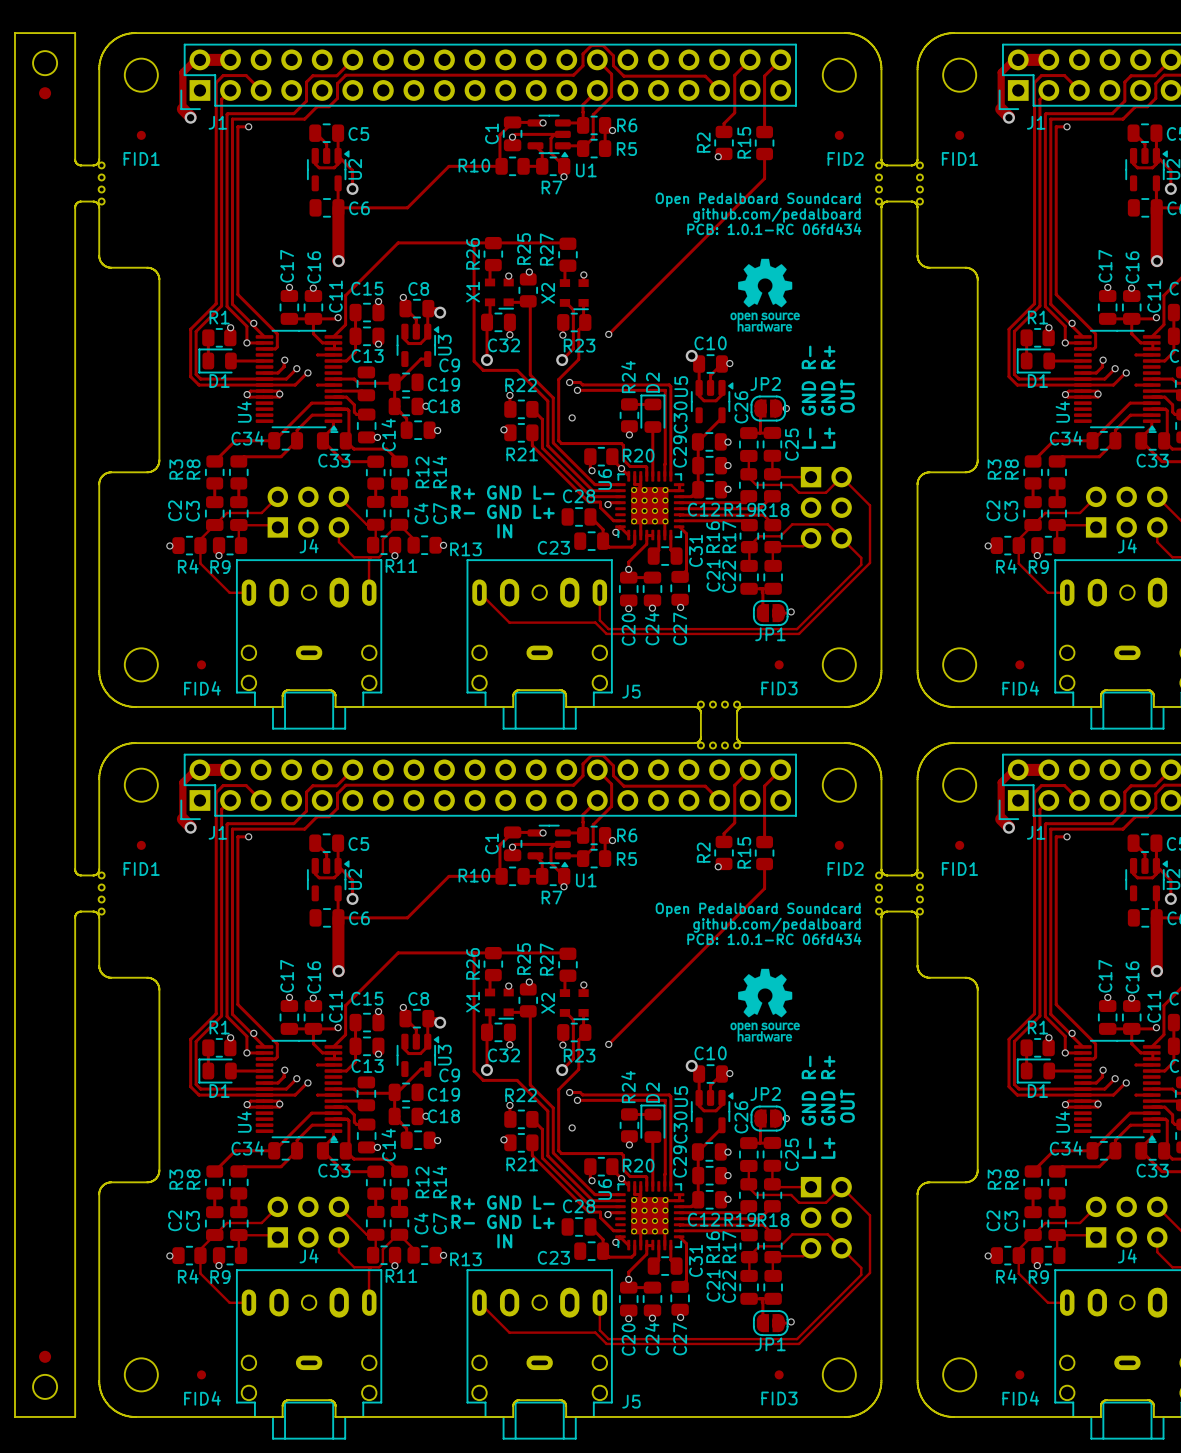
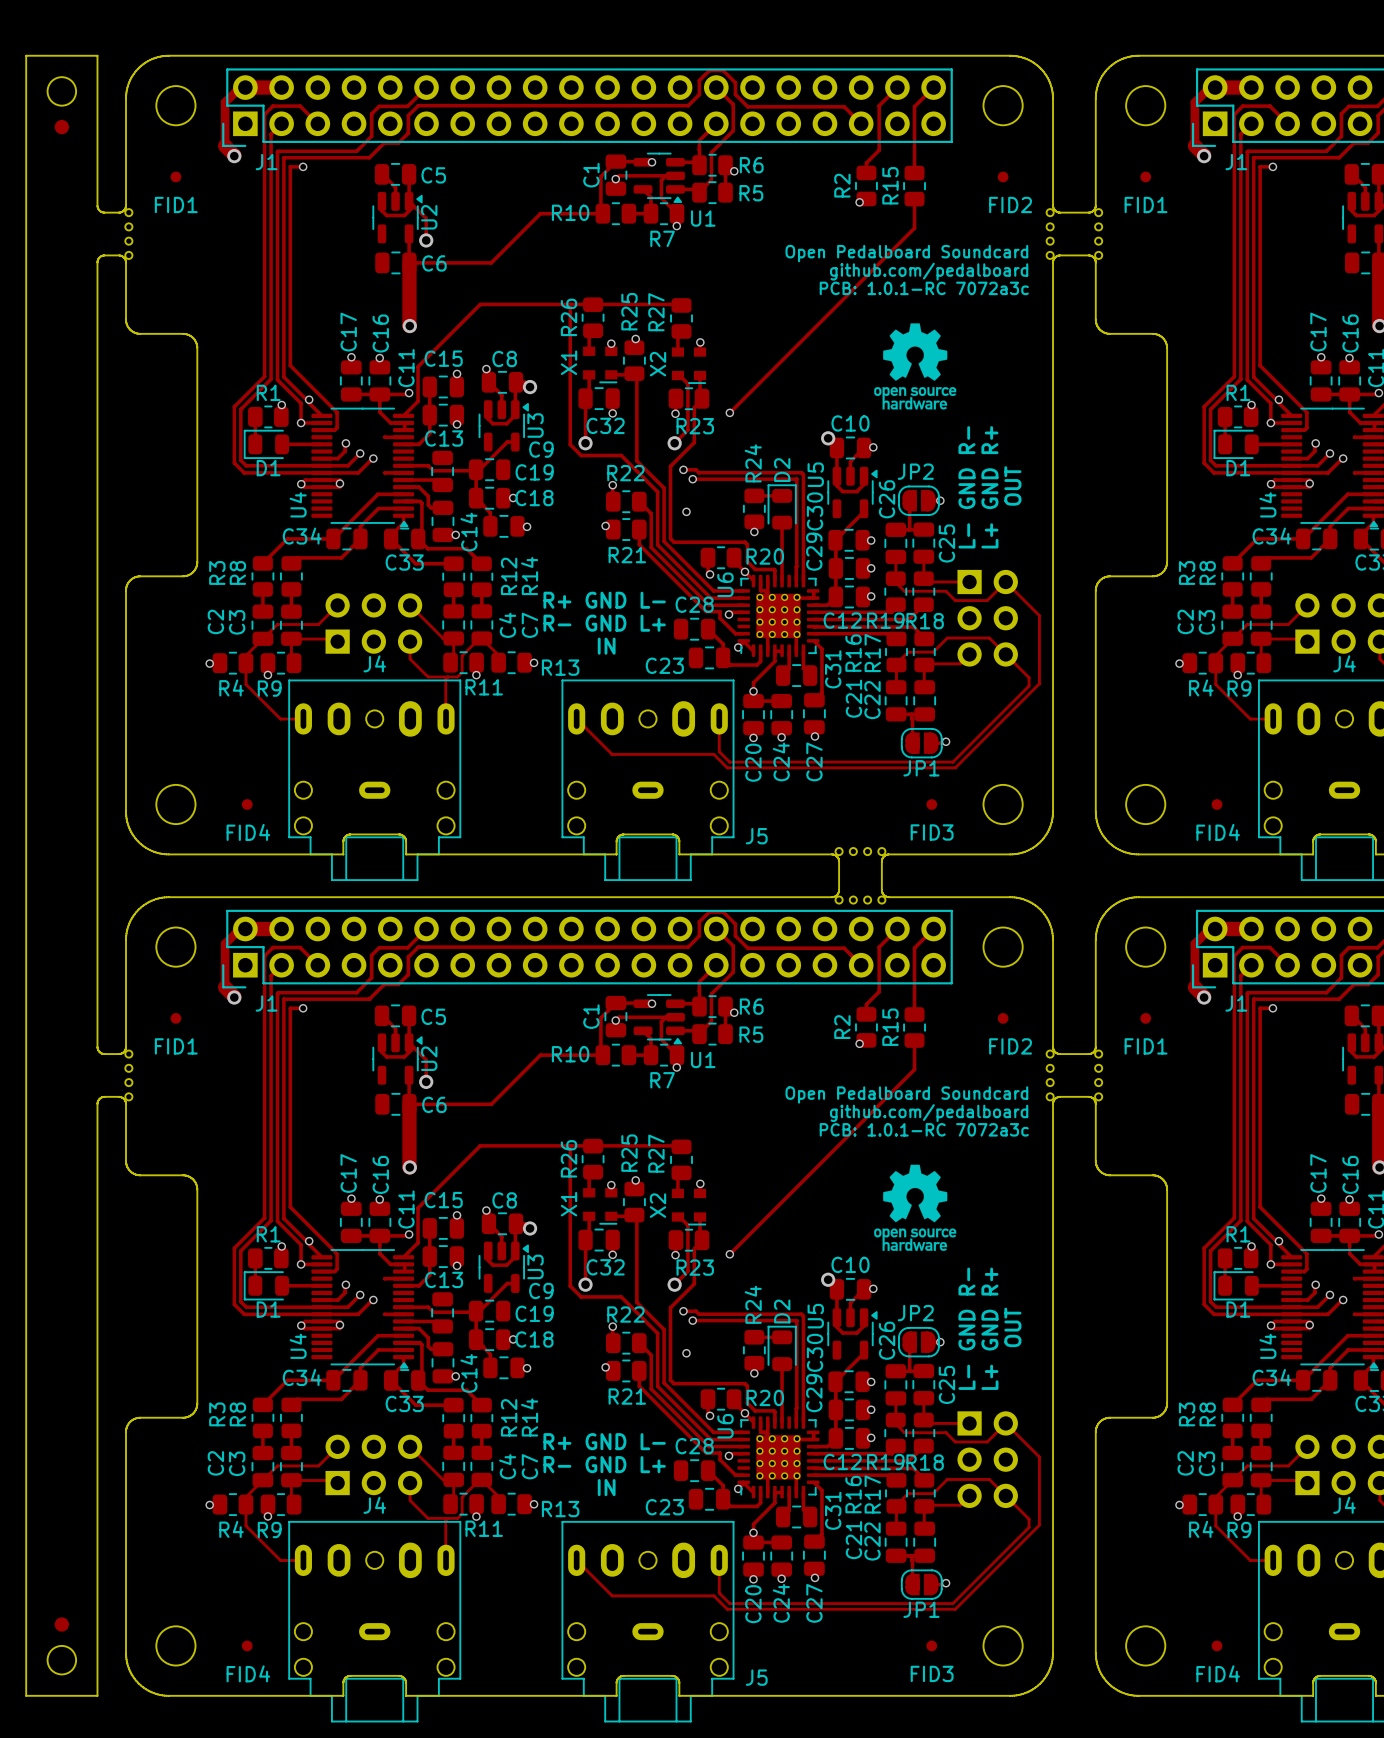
text: PCB: 1.0.1-RC 06fd434 (774, 229) -> PCB: 1.0.1-RC 7072a3c (924, 288)
text: PCB: 1.0.1-RC 06fd434 (774, 939) -> PCB: 1.0.1-RC 7072a3c (924, 1129)

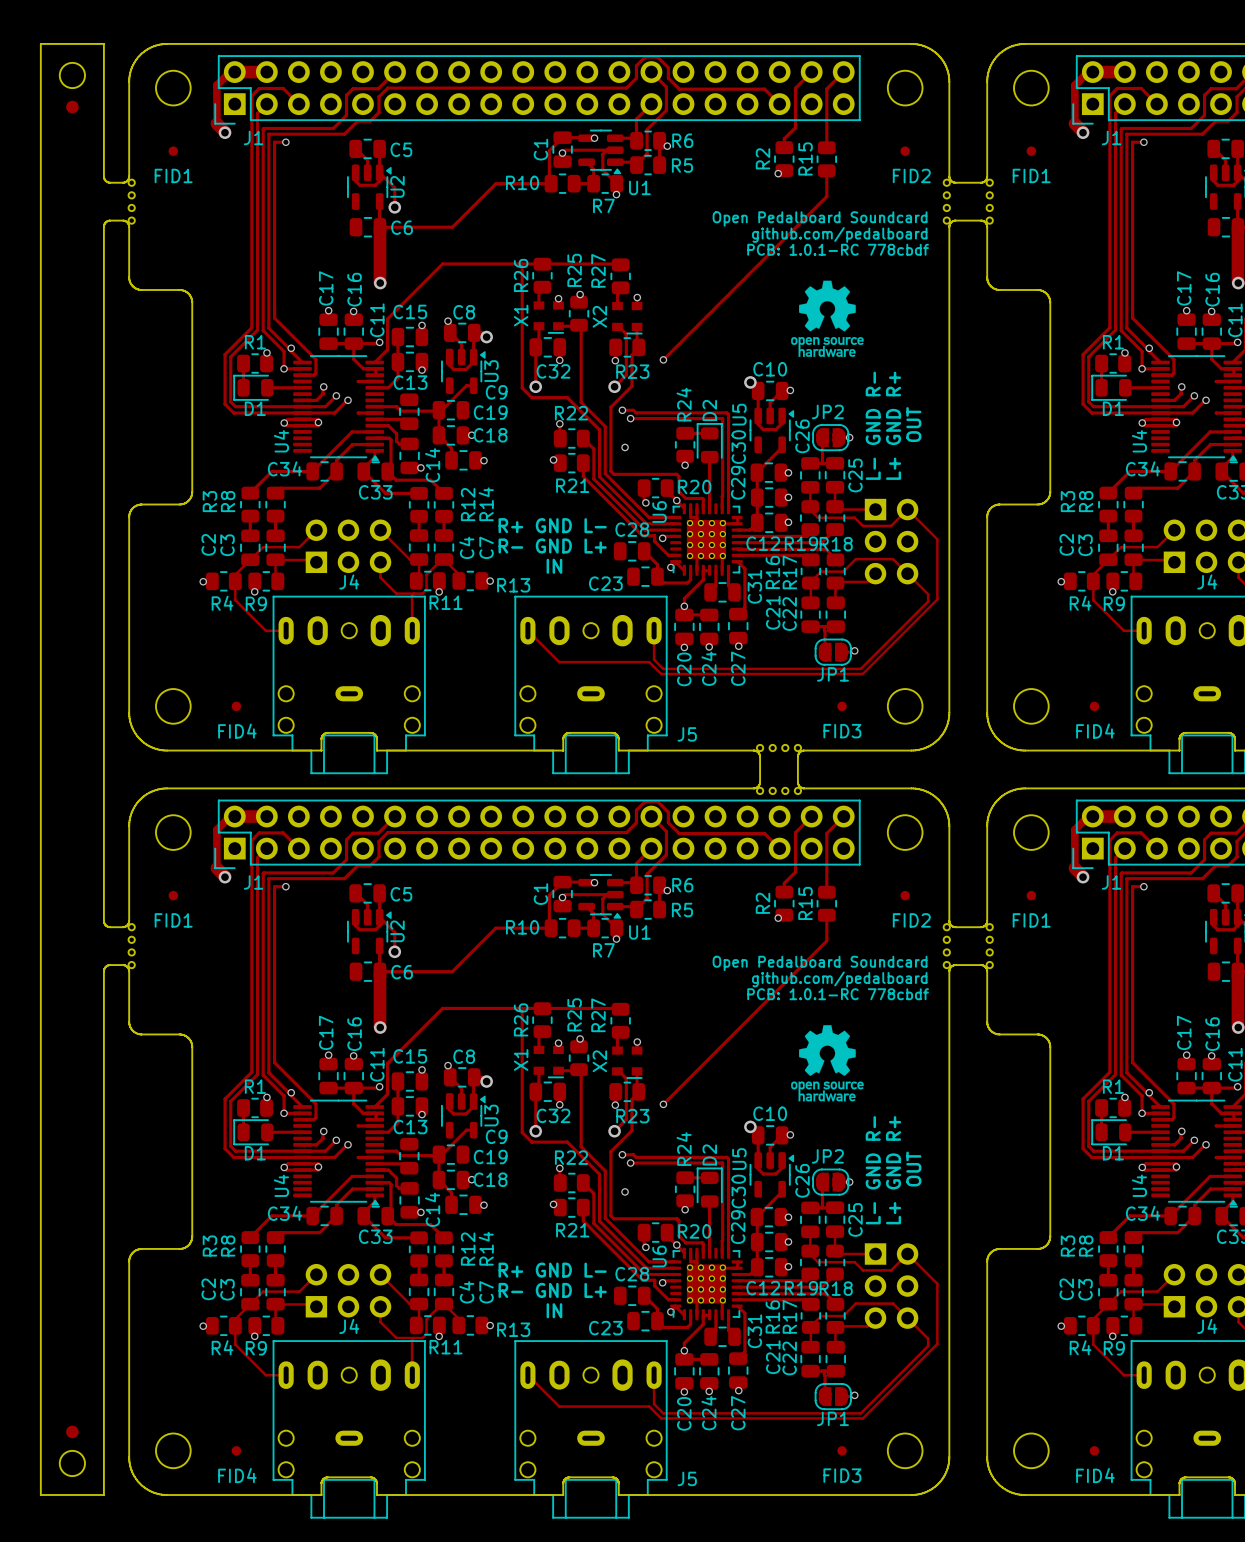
text: PCB: 1.0.1-RC 7072a3c (924, 288) -> PCB: 1.0.1-RC 778cbdf (838, 249)
text: PCB: 1.0.1-RC 7072a3c (924, 1129) -> PCB: 1.0.1-RC 778cbdf (838, 994)

